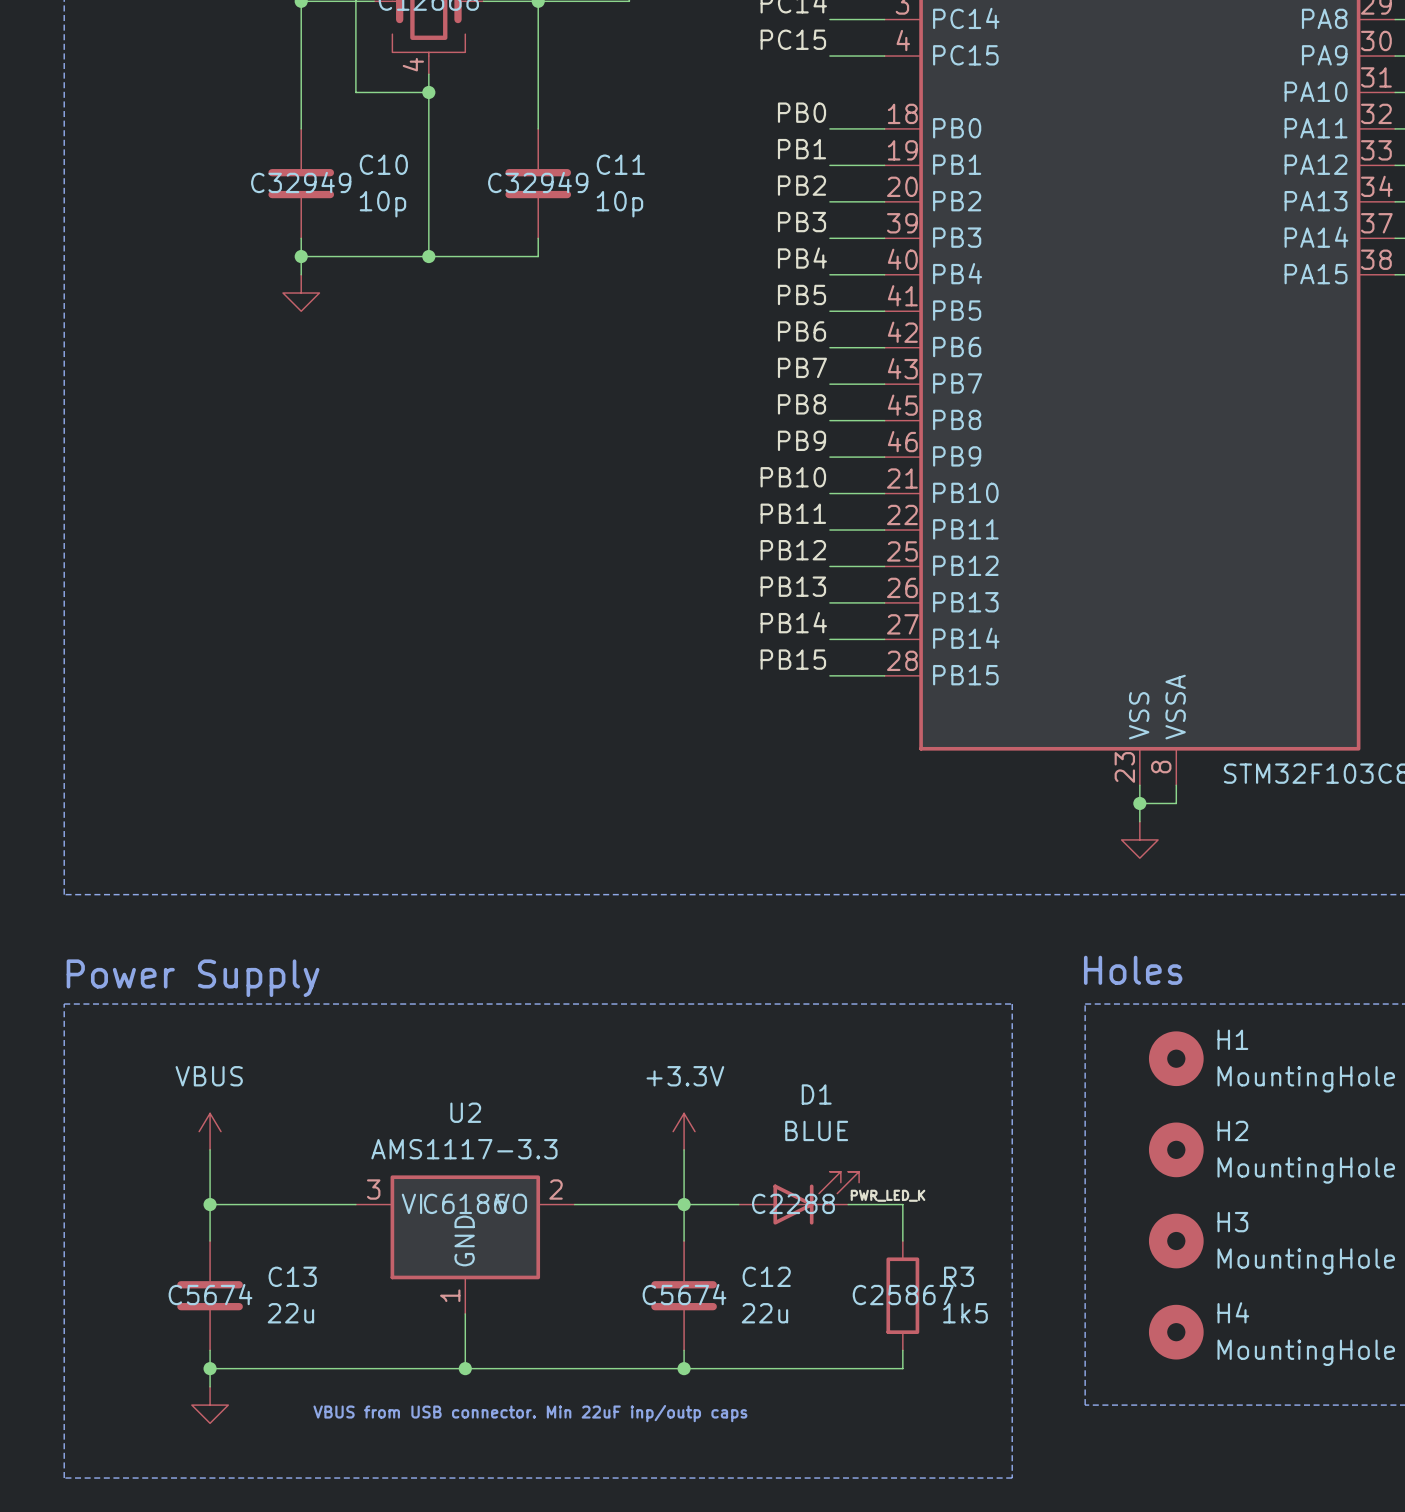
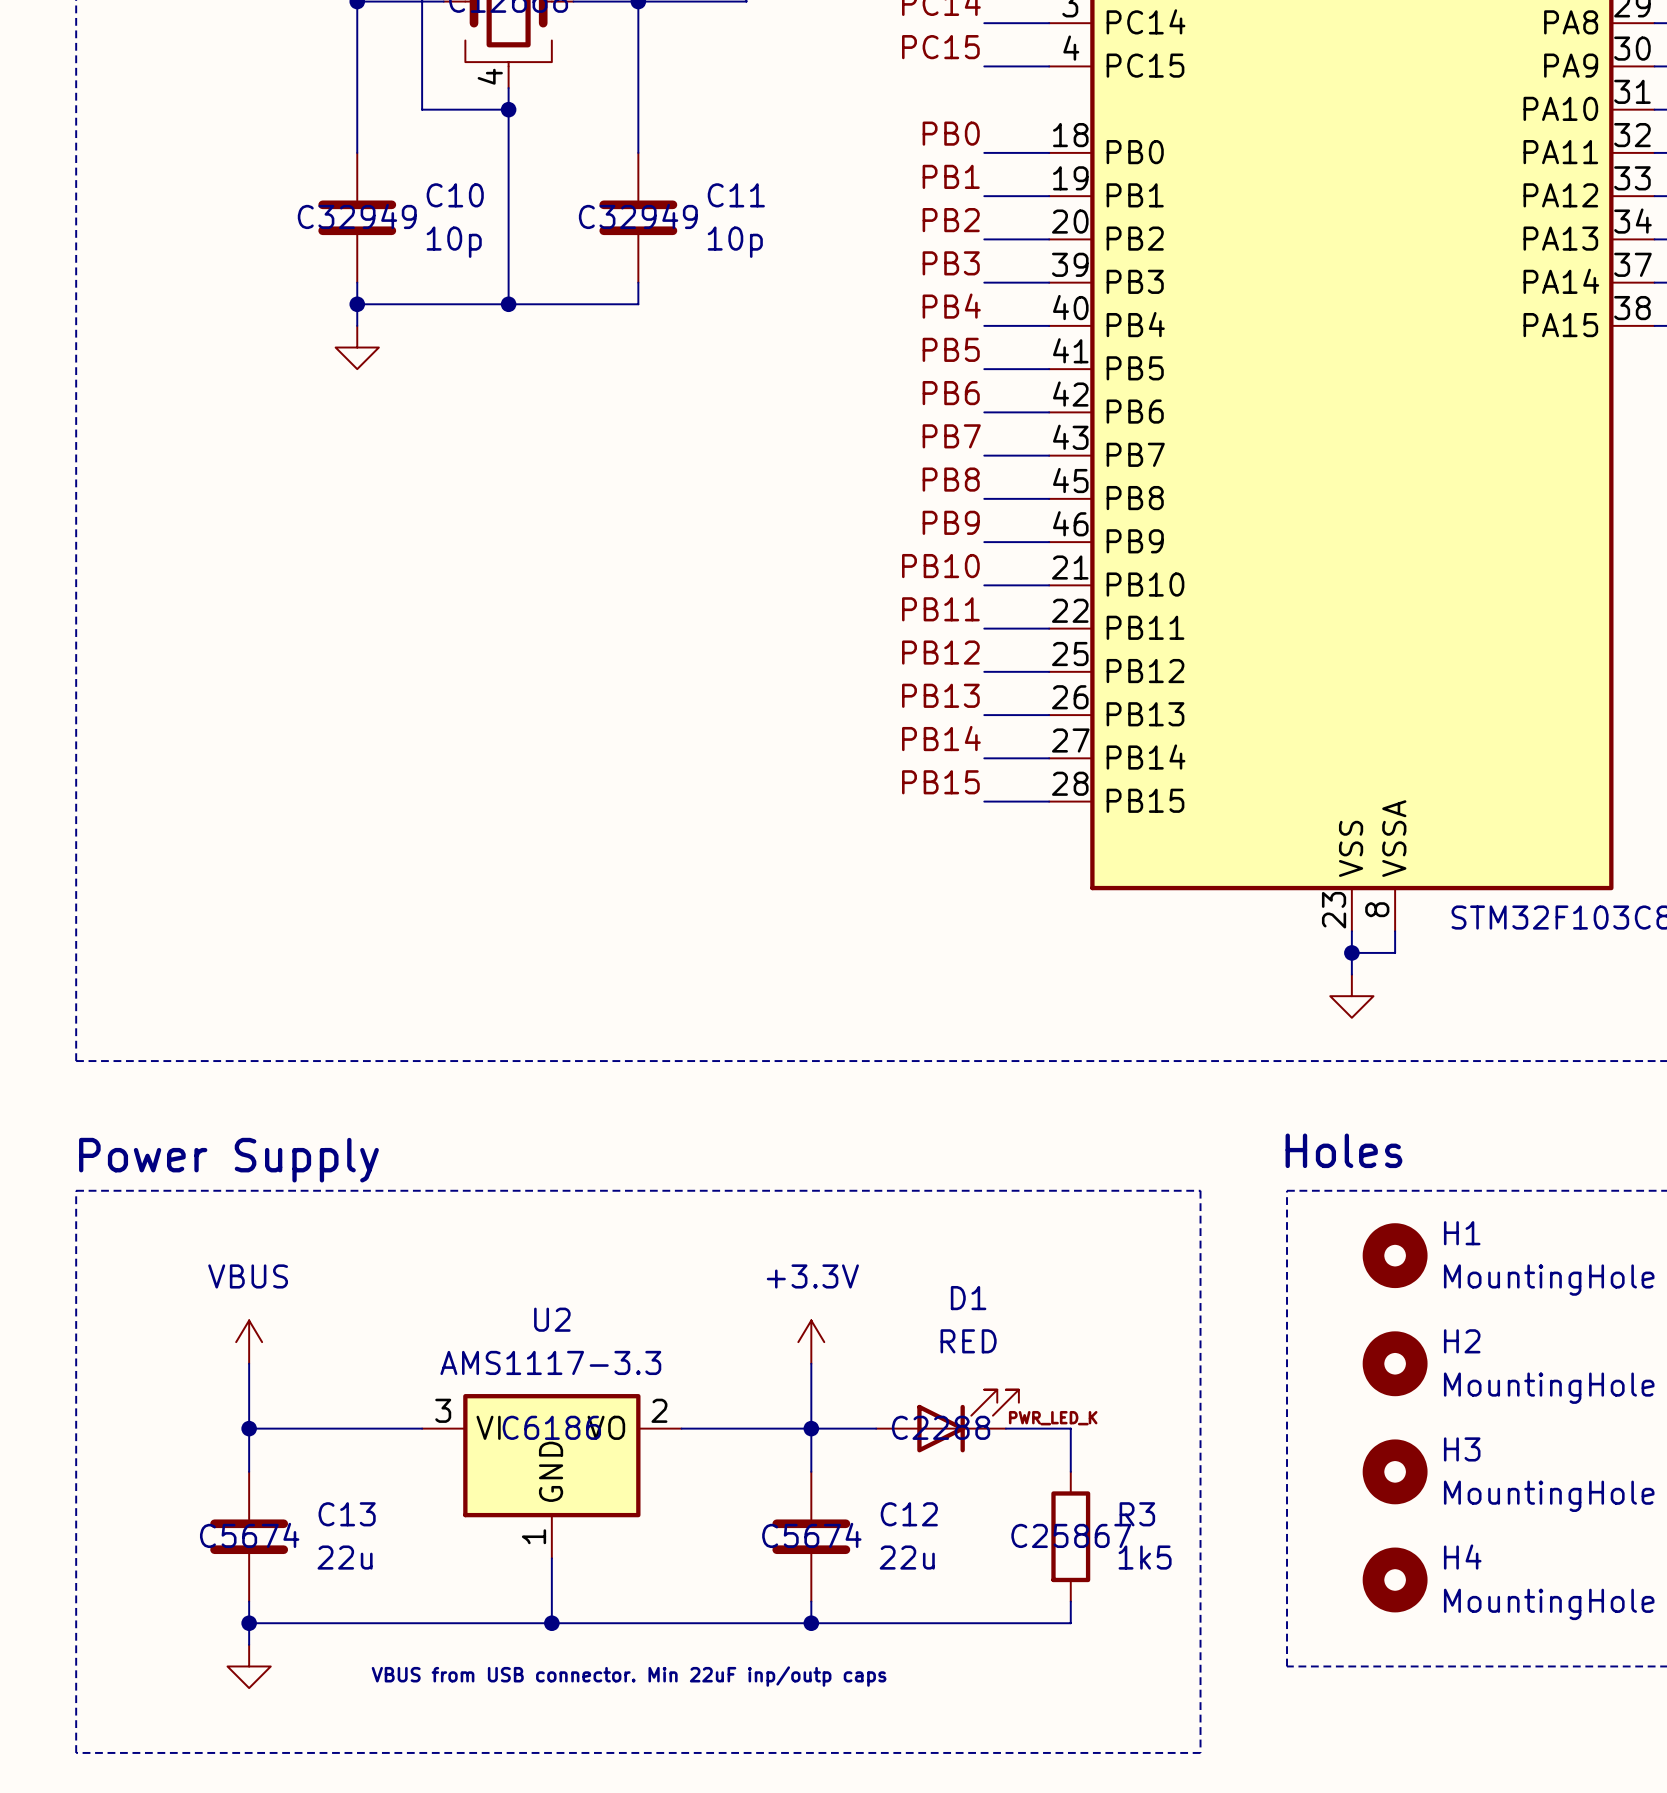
D1 value: BLUE (816, 1130) -> RED (968, 1341)

